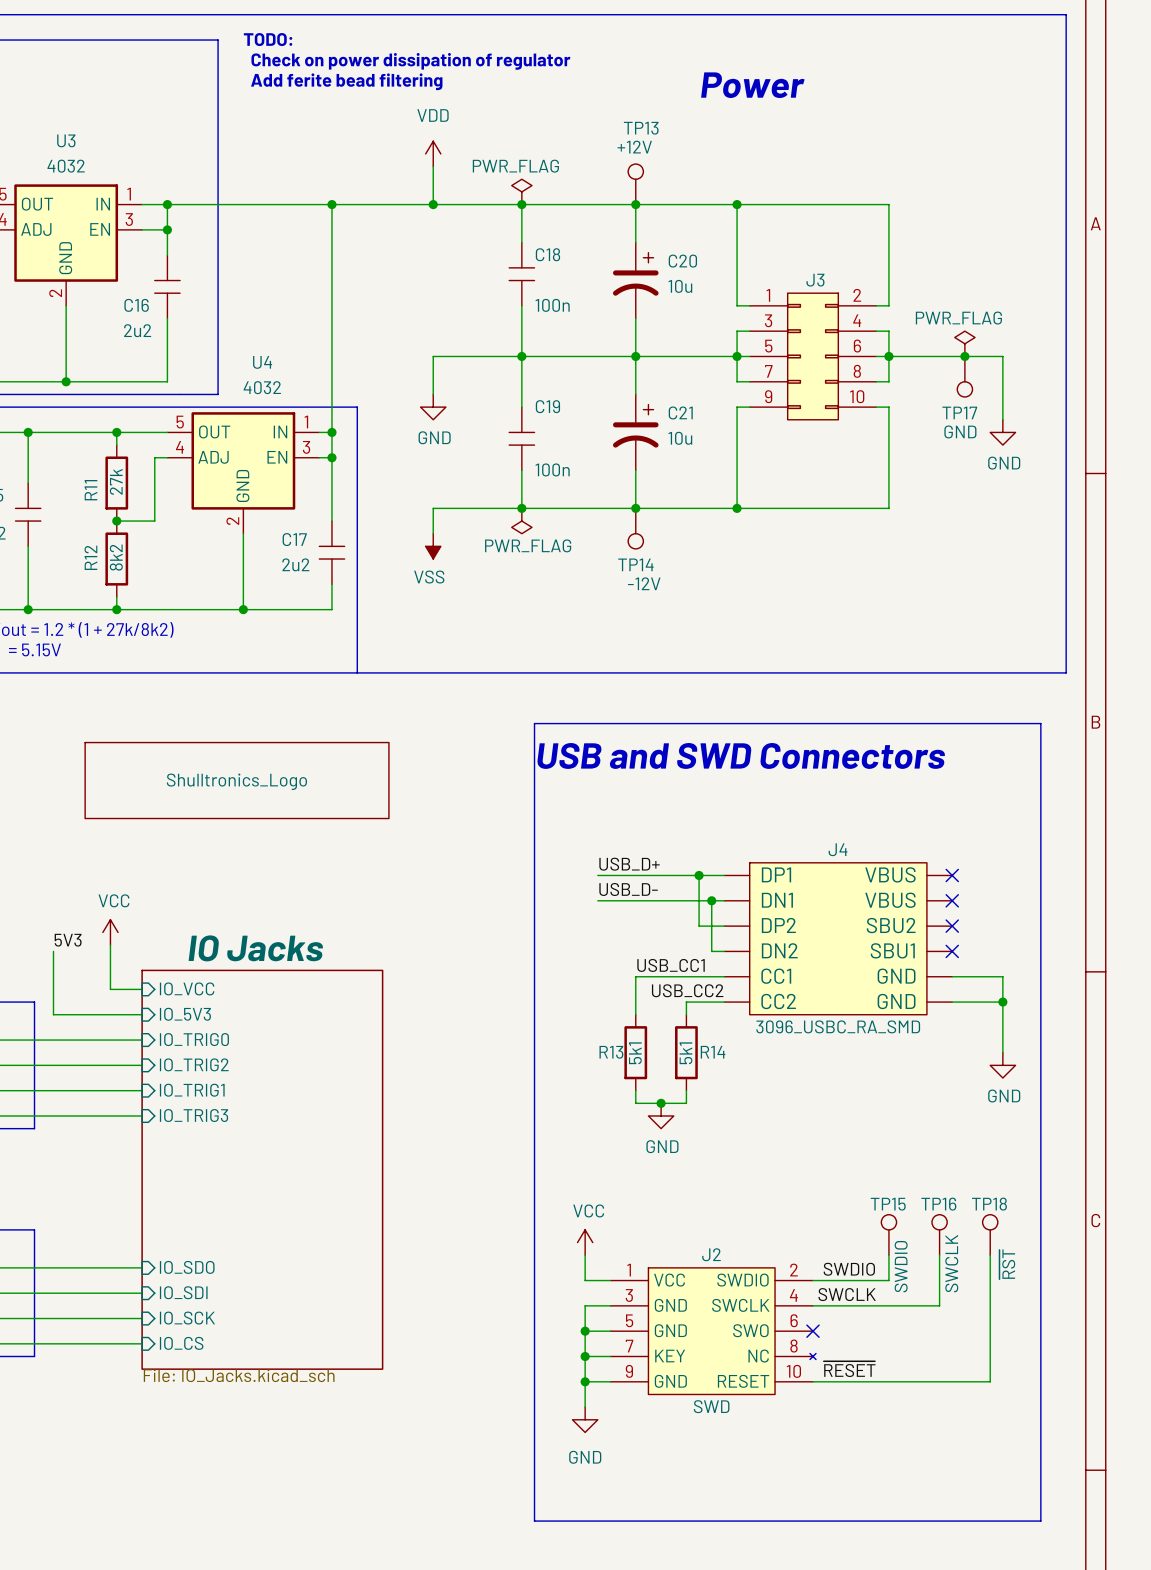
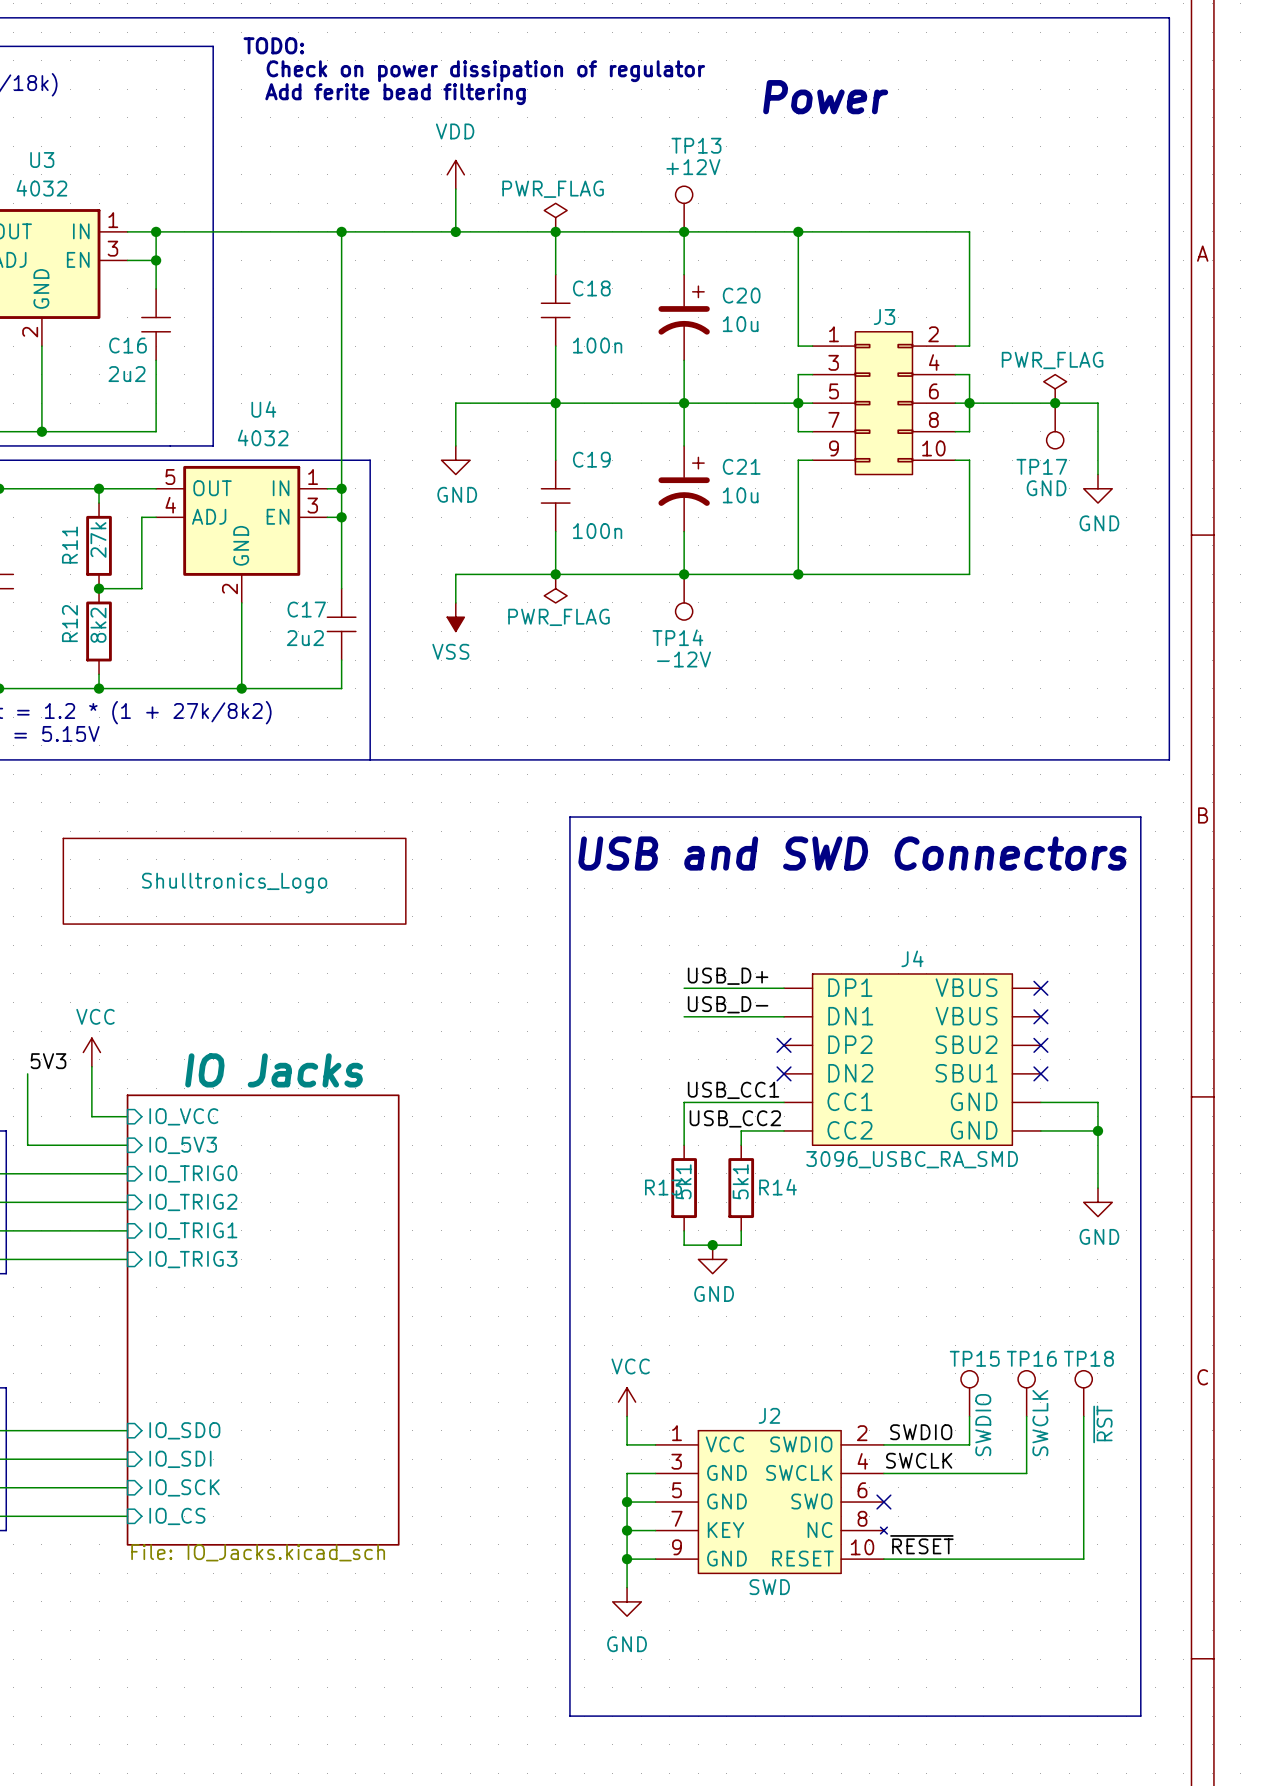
label position: USB_D+ (629, 864) -> USB_D+ (728, 976)
wire: (597, 875) (635, 875) -> none
wire: (699, 875) (699, 926) (724, 926) -> none
junction: (699, 875) -> none
label position: USB_D- (628, 889) -> USB_D- (728, 1004)
wire: (597, 900) (635, 900) -> none
wire: (711, 900) (711, 951) (724, 951) -> none
junction: (711, 900) -> none
no-connect mark: none -> (784, 1045)
no-connect mark: none -> (784, 1073)

